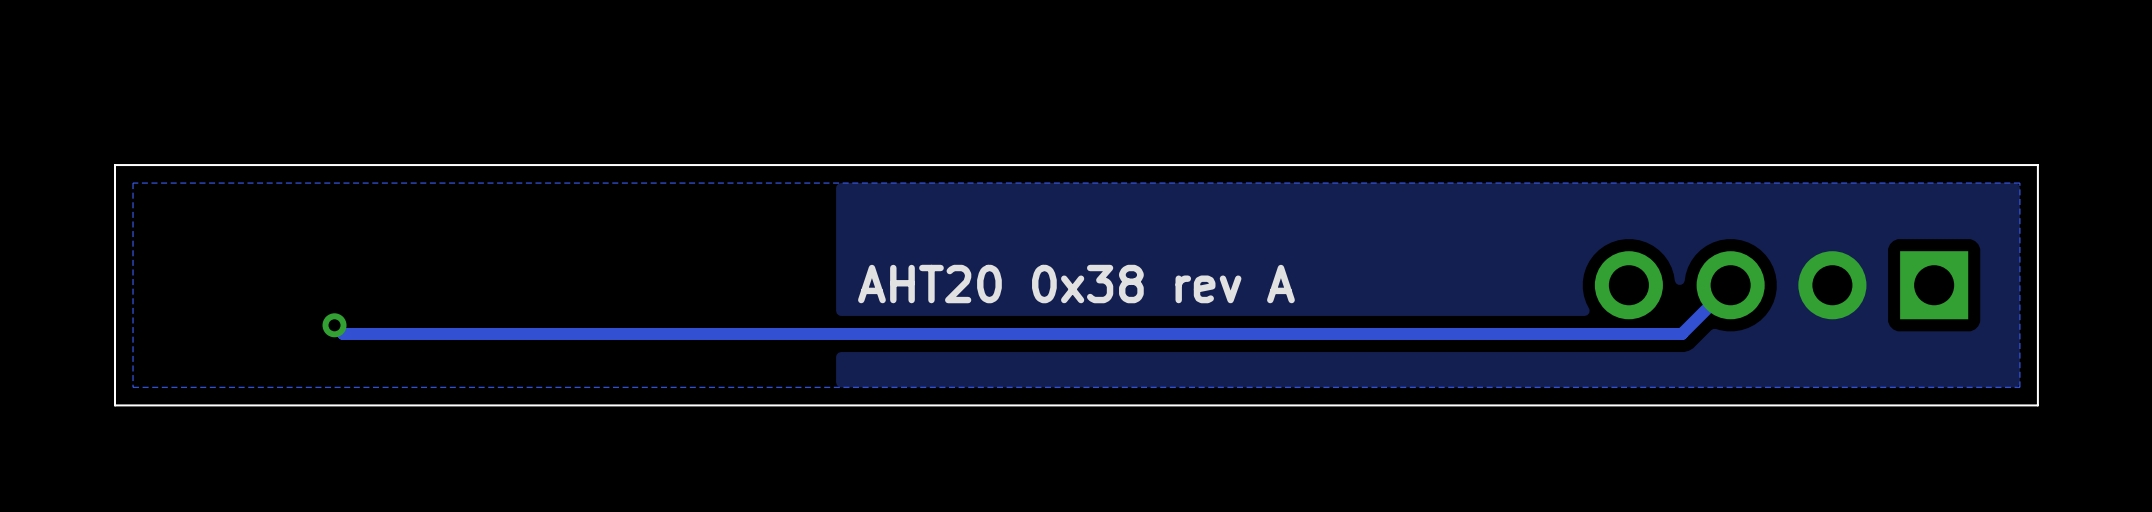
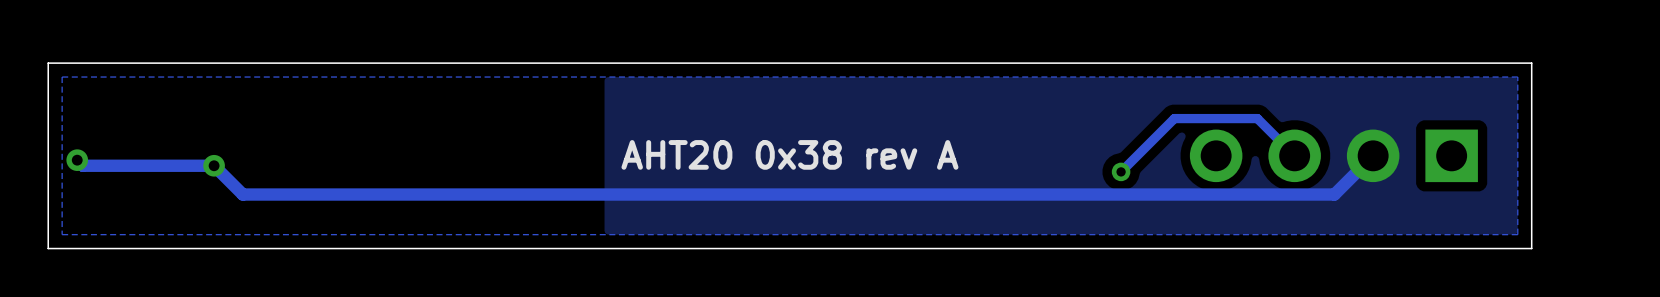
track: (1730, 285) (1681, 333) (343, 333) (334, 325) -> (1294, 155) (1257, 118) (1174, 118) (1121, 171)
track: none -> (1373, 155) (1334, 194) (242, 194) (214, 165) (82, 165) (77, 160)
via: none -> (77, 160)
via: none -> (214, 165)
via: none -> (1121, 171)
via: (334, 325) -> none

